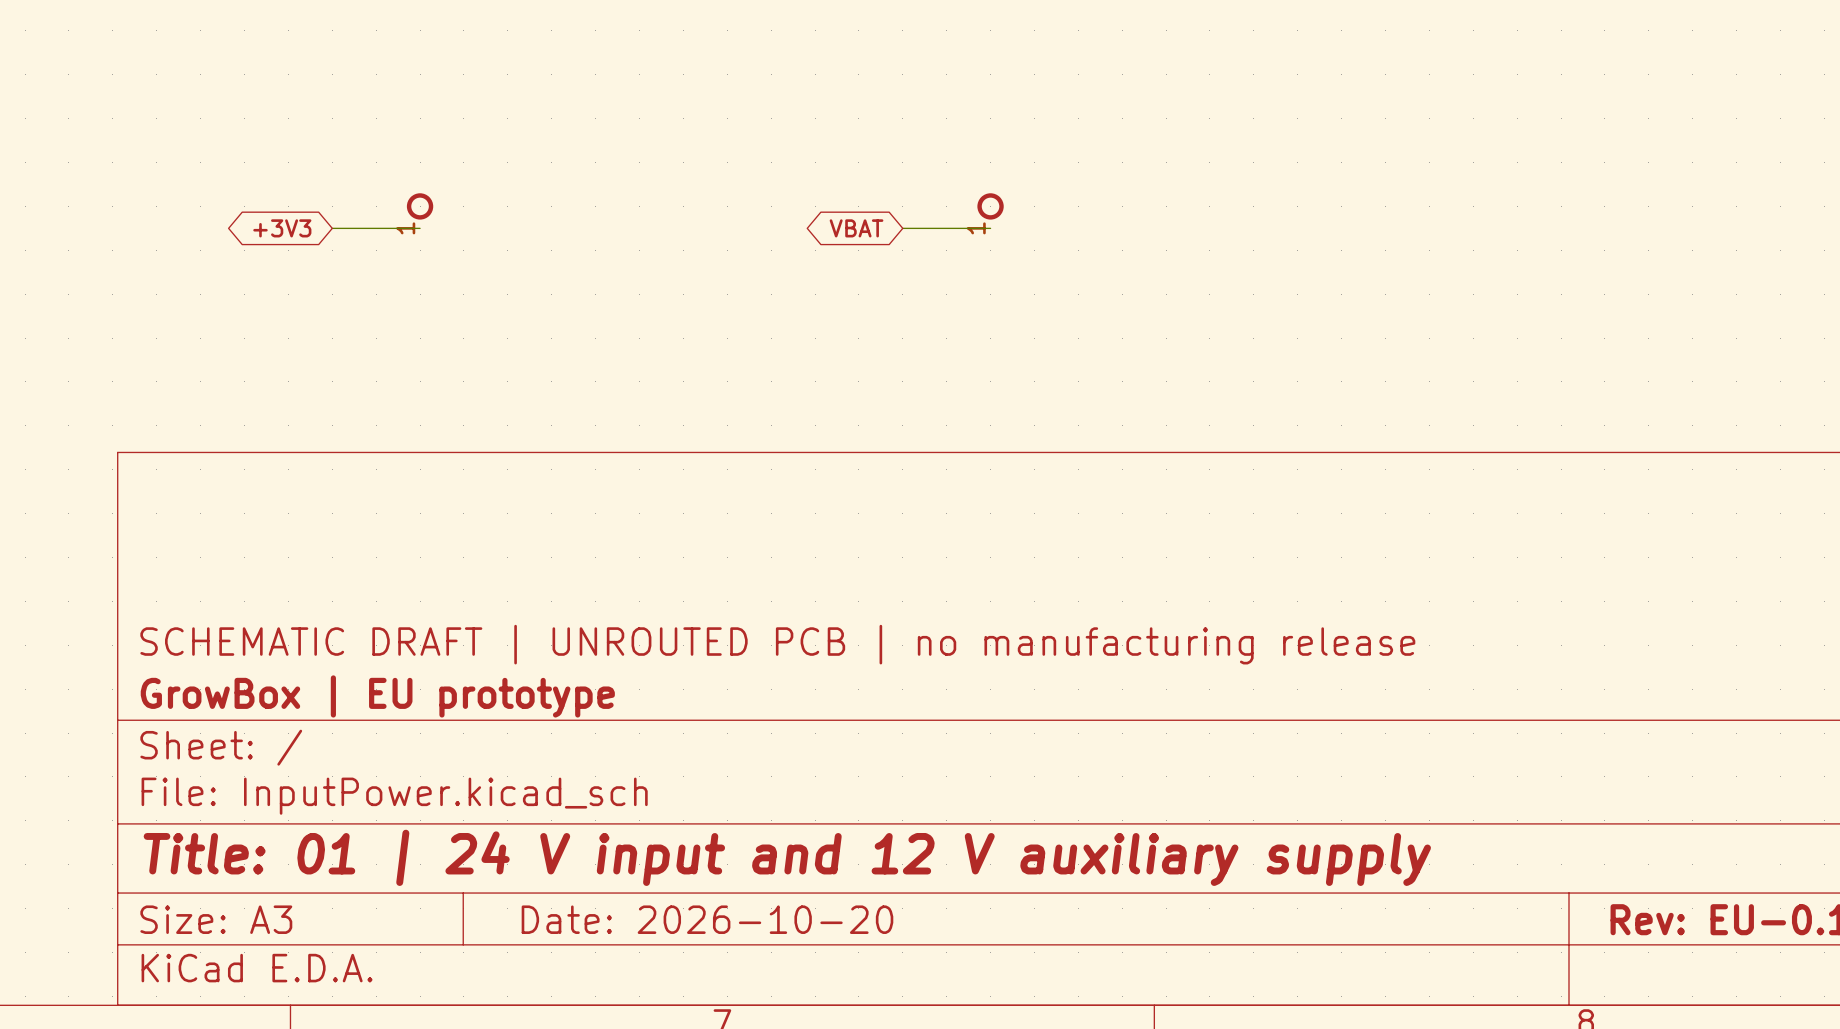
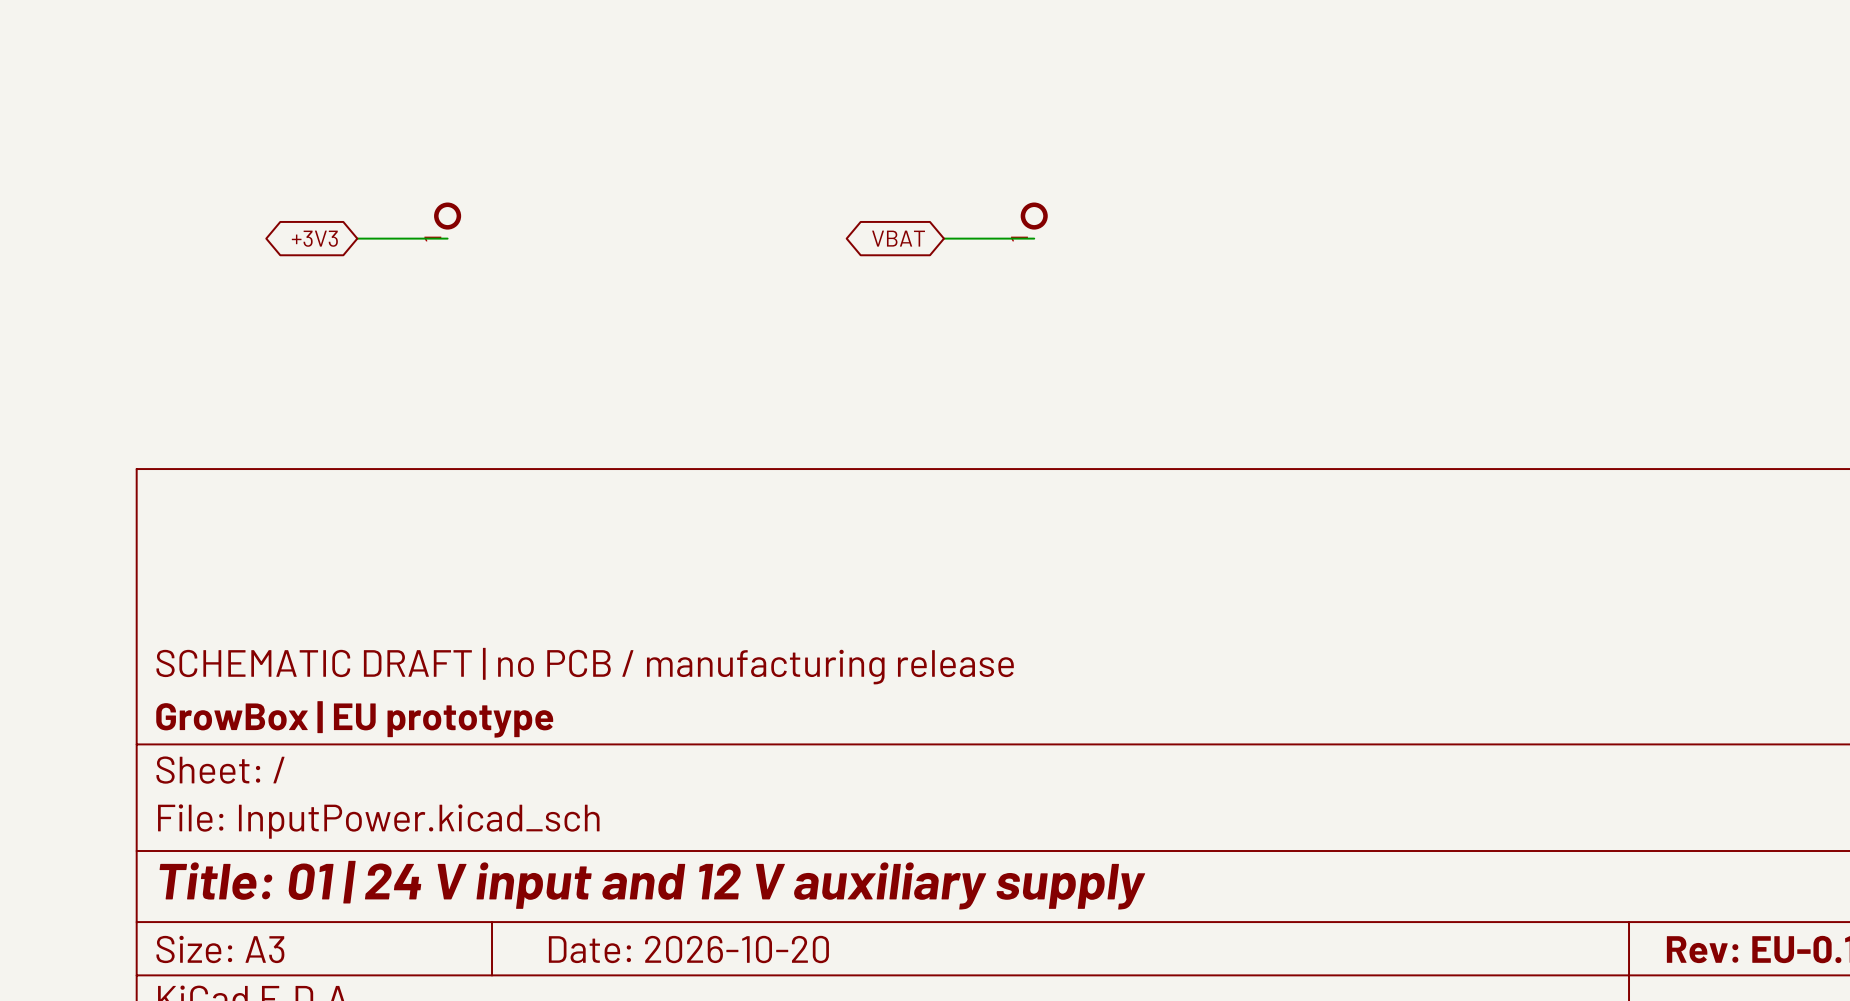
title block: SCHEMATIC DRAFT | UNROUTED PCB | no manufacturing release (777, 644) -> SCHEMATIC DRAFT | no PCB / manufacturing release (585, 666)

